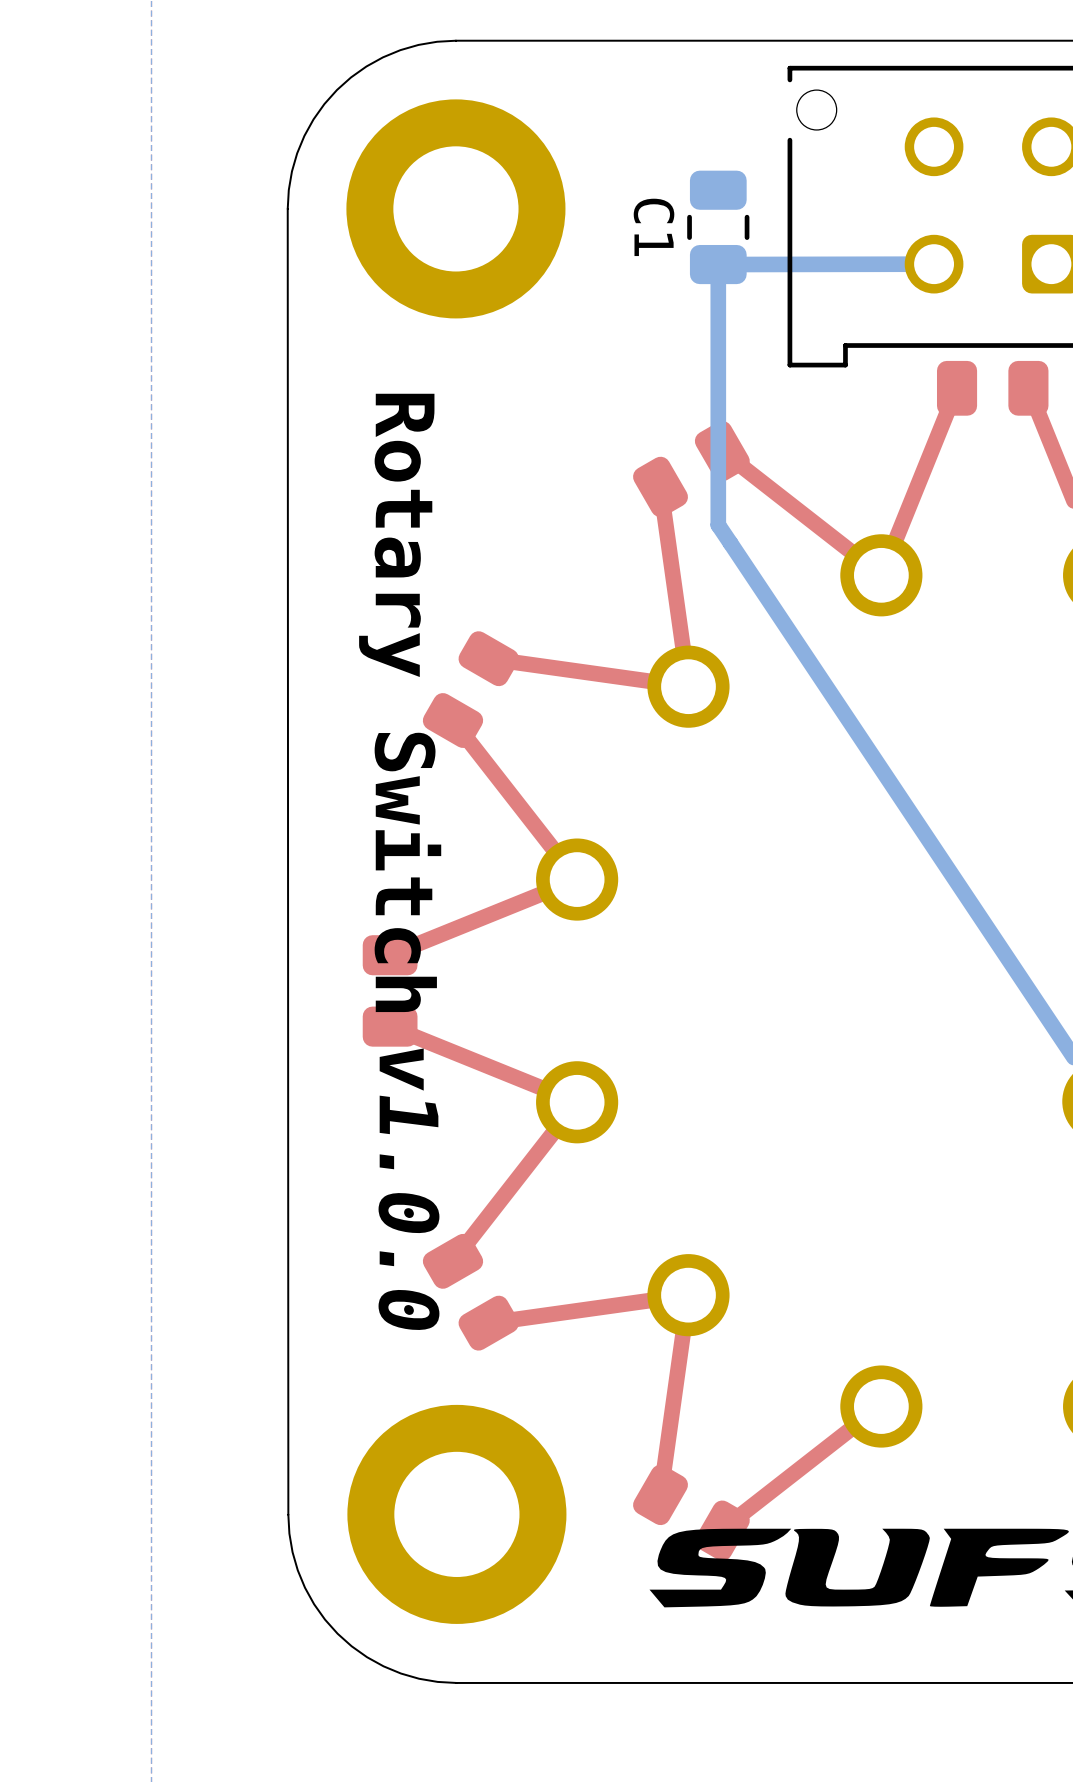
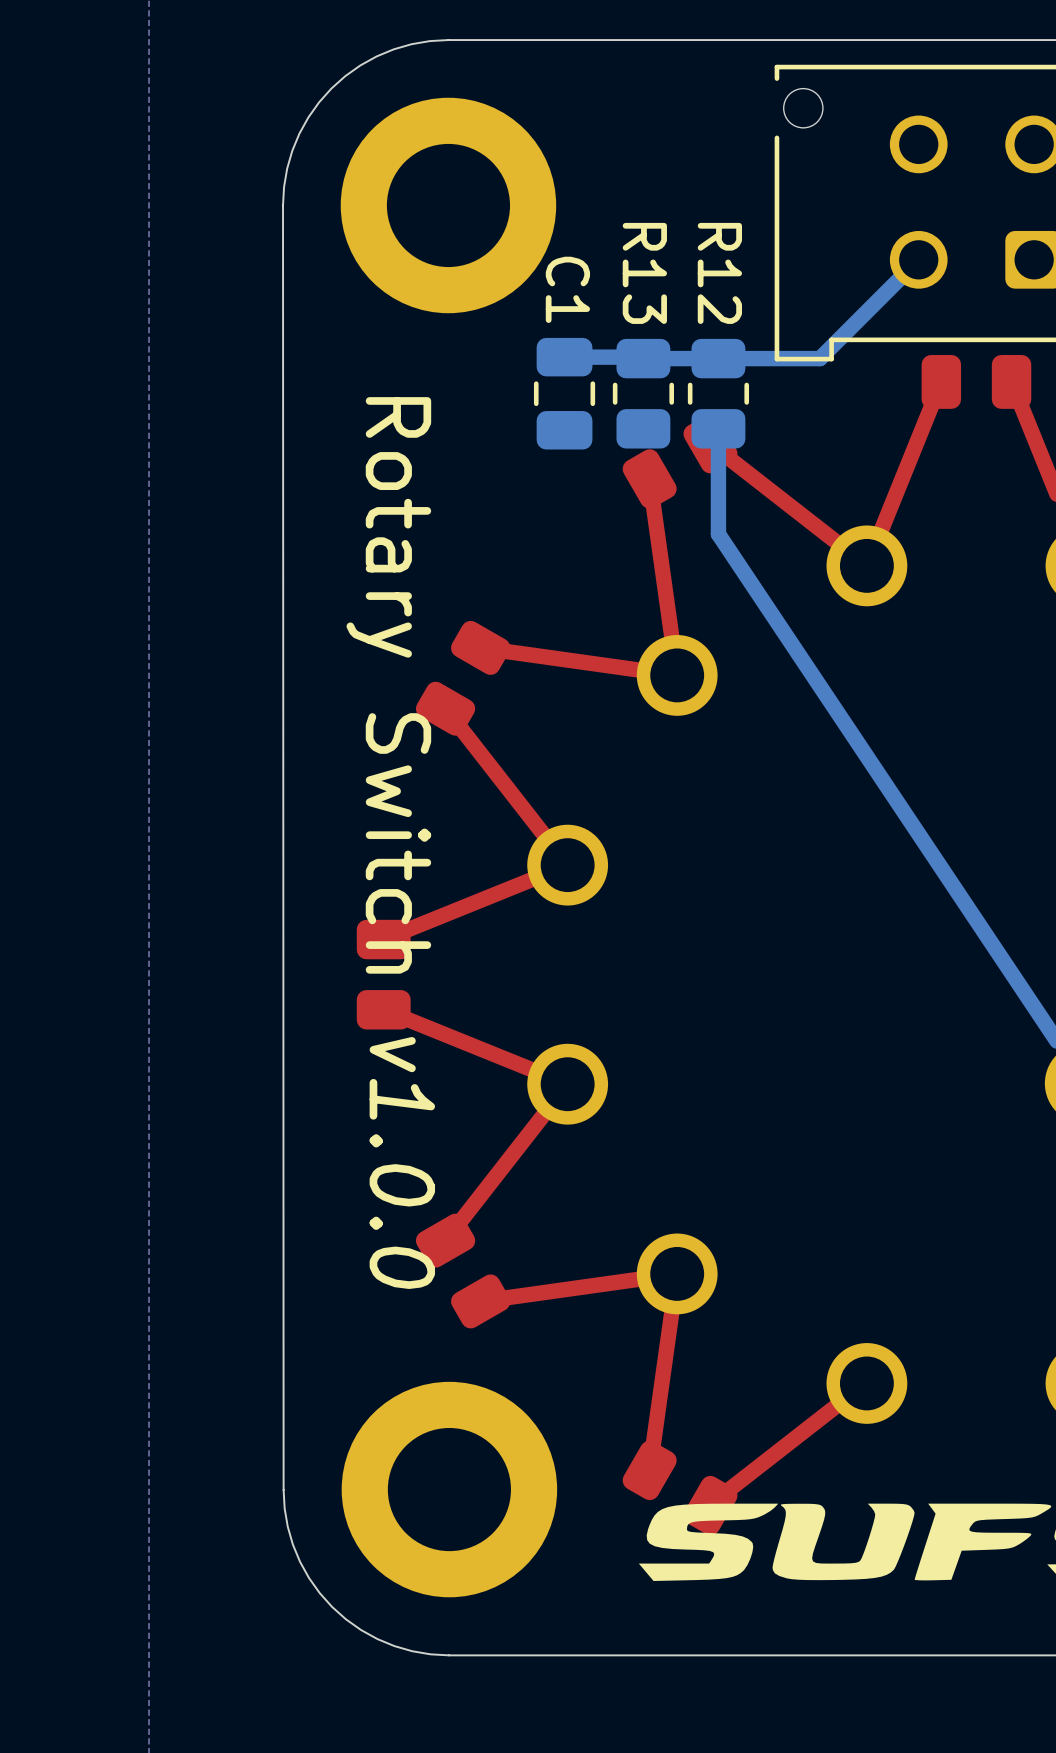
C1 name position: C1 (654, 227) -> C1 (567, 289)
C1 position: (718, 227) -> (564, 393)
bottom track: (934, 264) (718, 264) (718, 525) (730, 543) -> (918, 259) (819, 358) (564, 357)
R13: none -> (643, 393)
R12: none -> (718, 393)
bottom track: none -> (718, 428) (718, 534)

